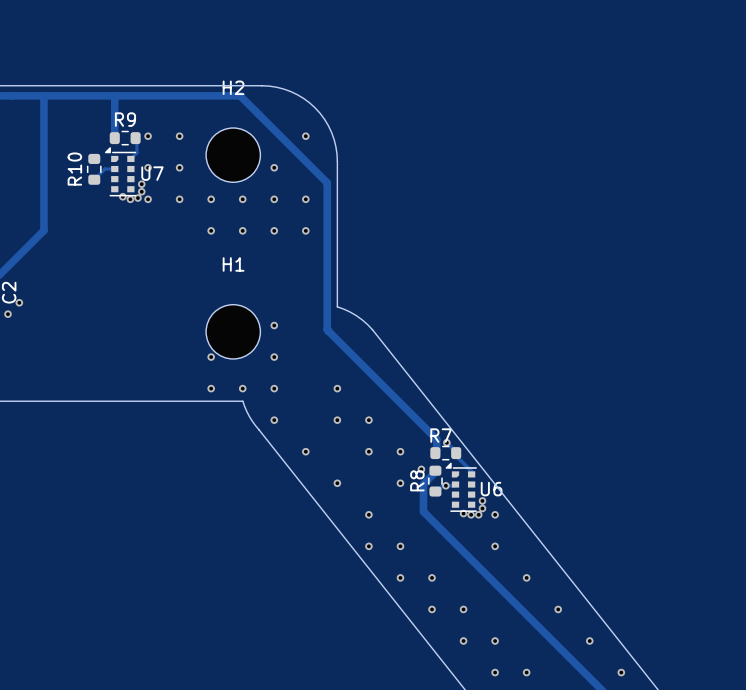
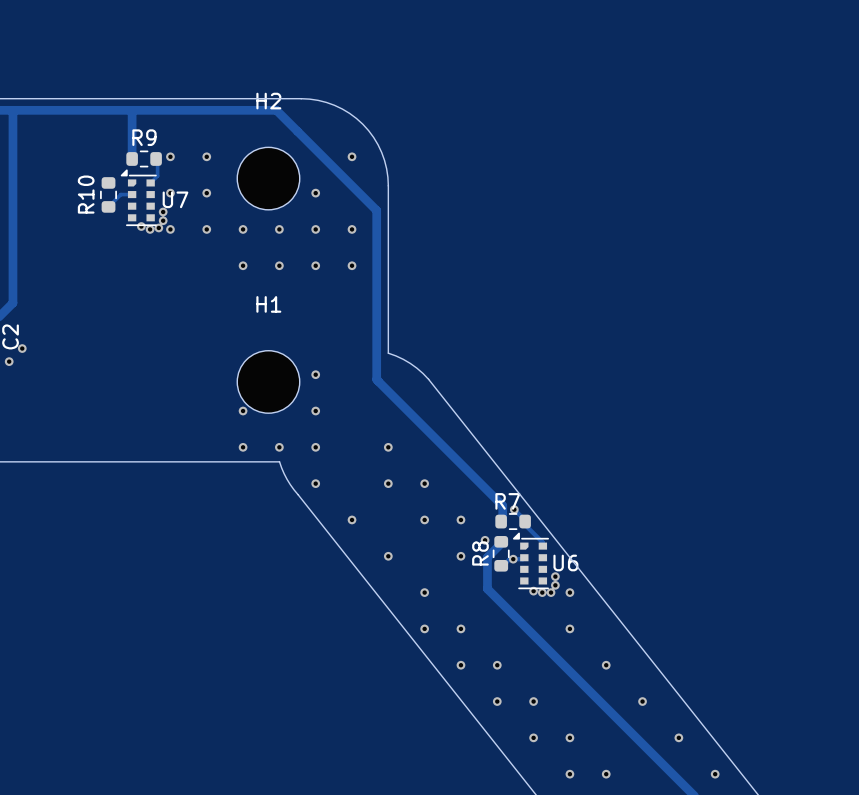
track: (43, 95) (43, 230) (11, 263) -> (12, 110) (12, 303)

